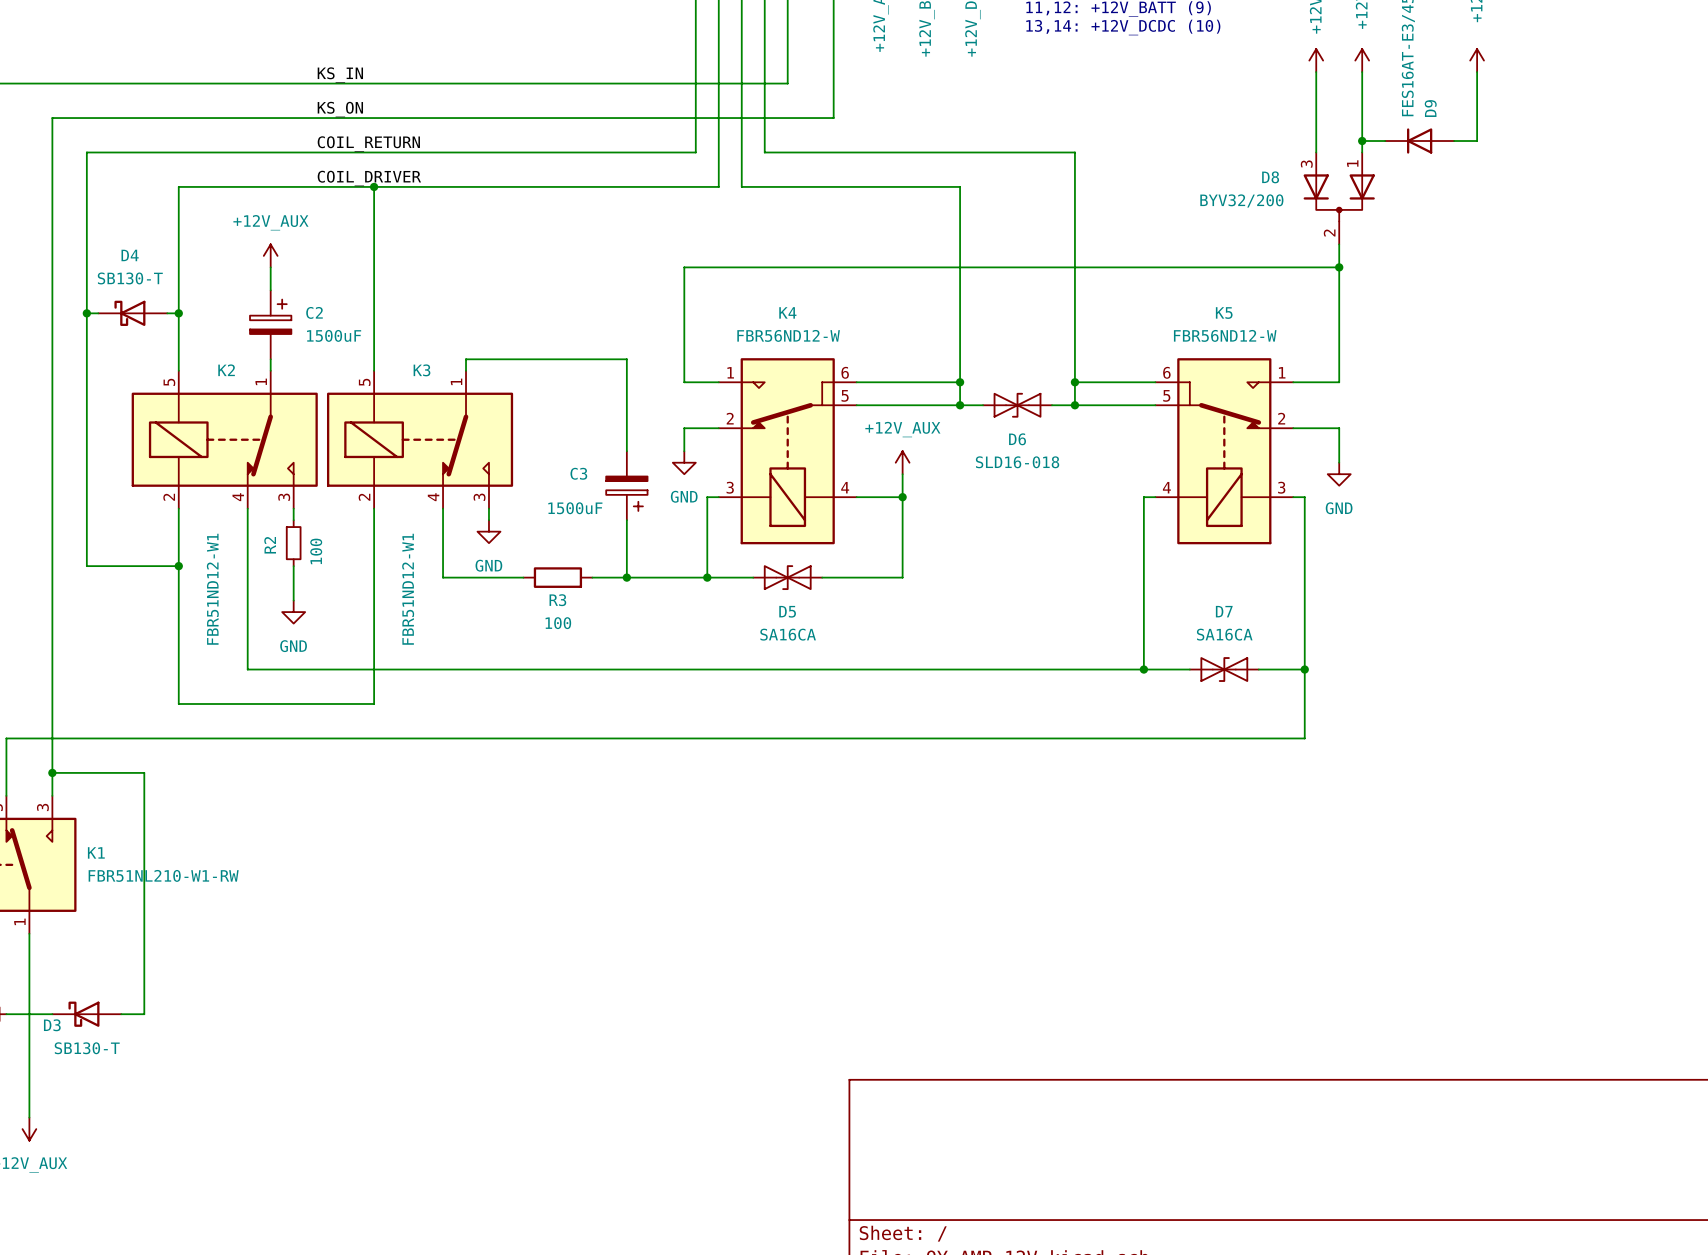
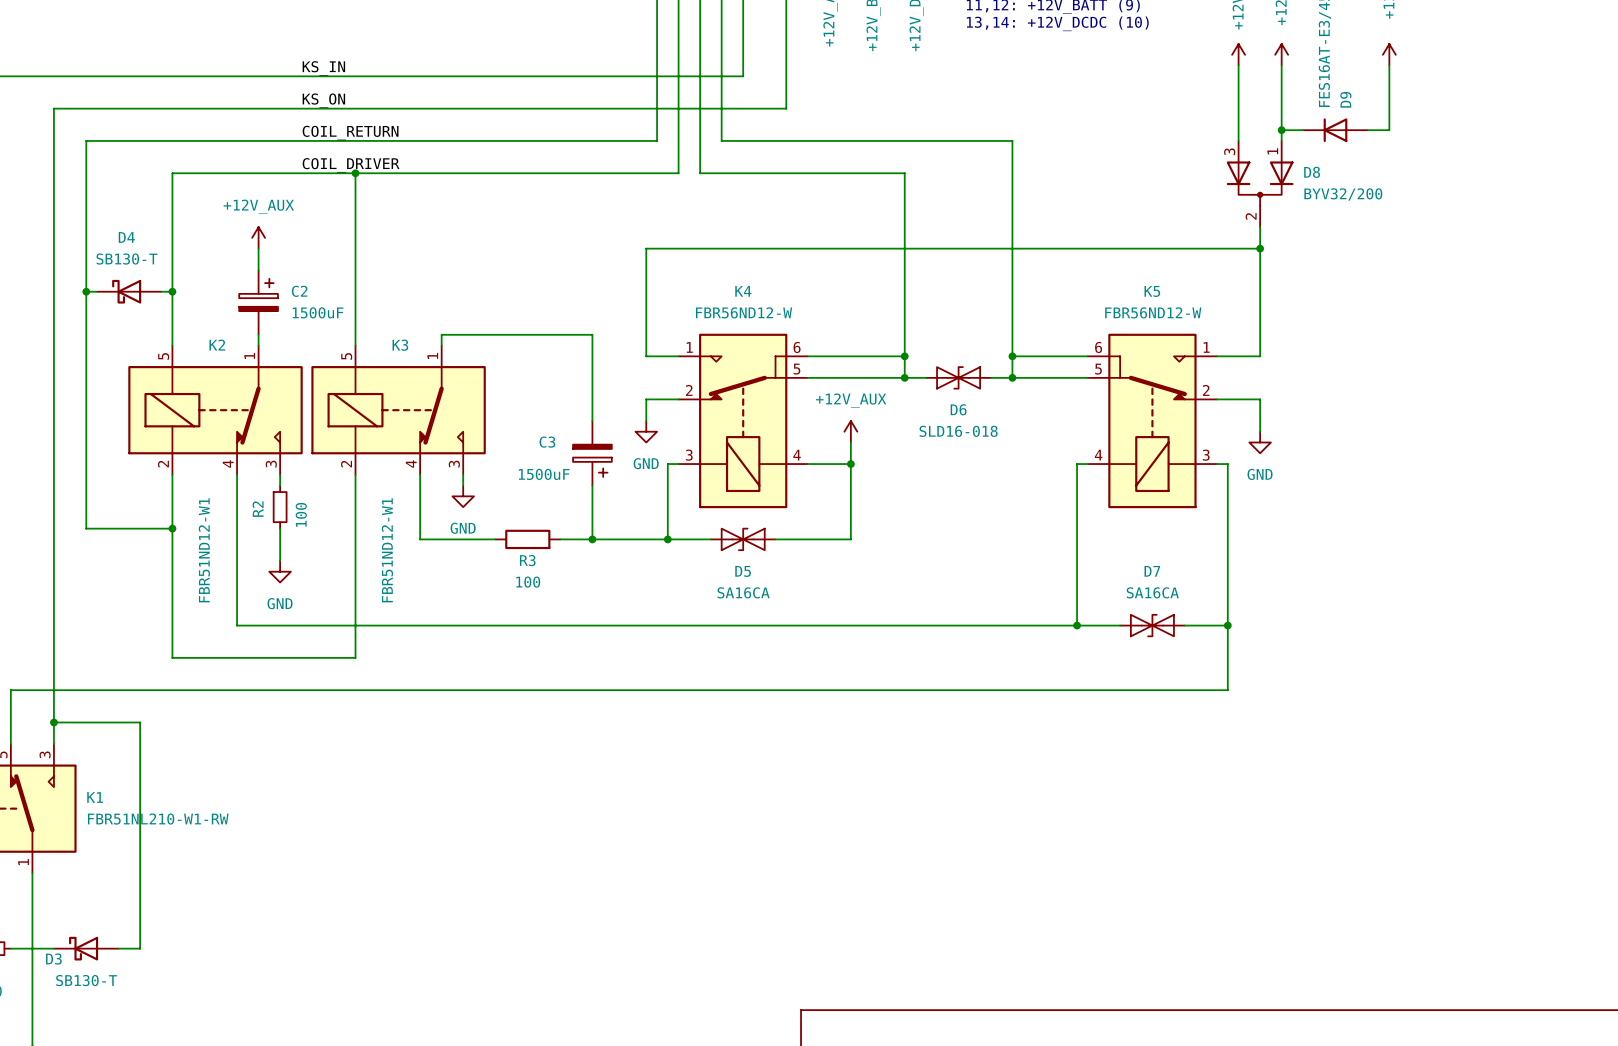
D8 name position: D8 (1270, 177) -> D8 (1312, 172)
D8 value position: BYV32/200 (1241, 200) -> BYV32/200 (1343, 194)

